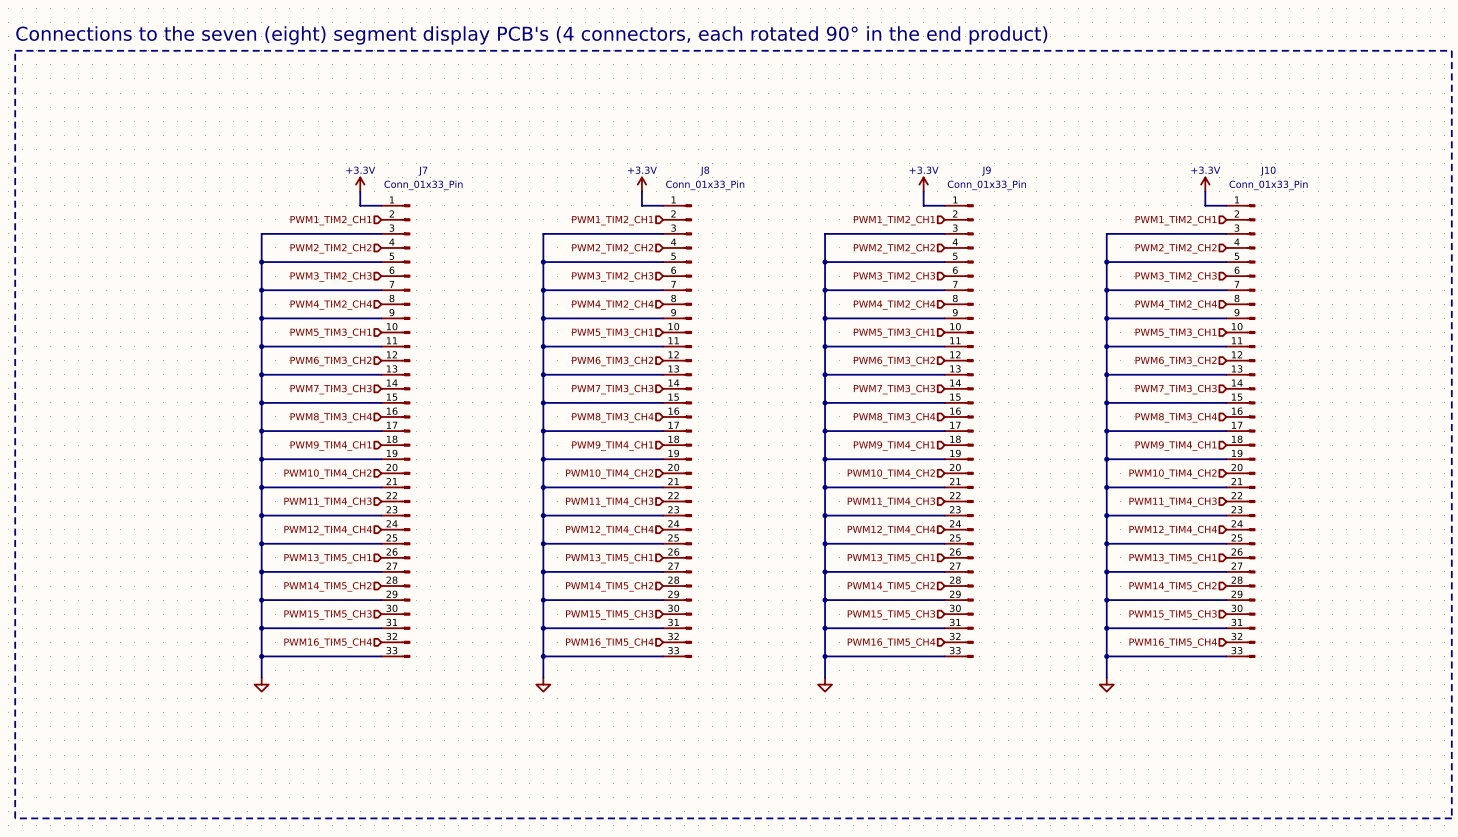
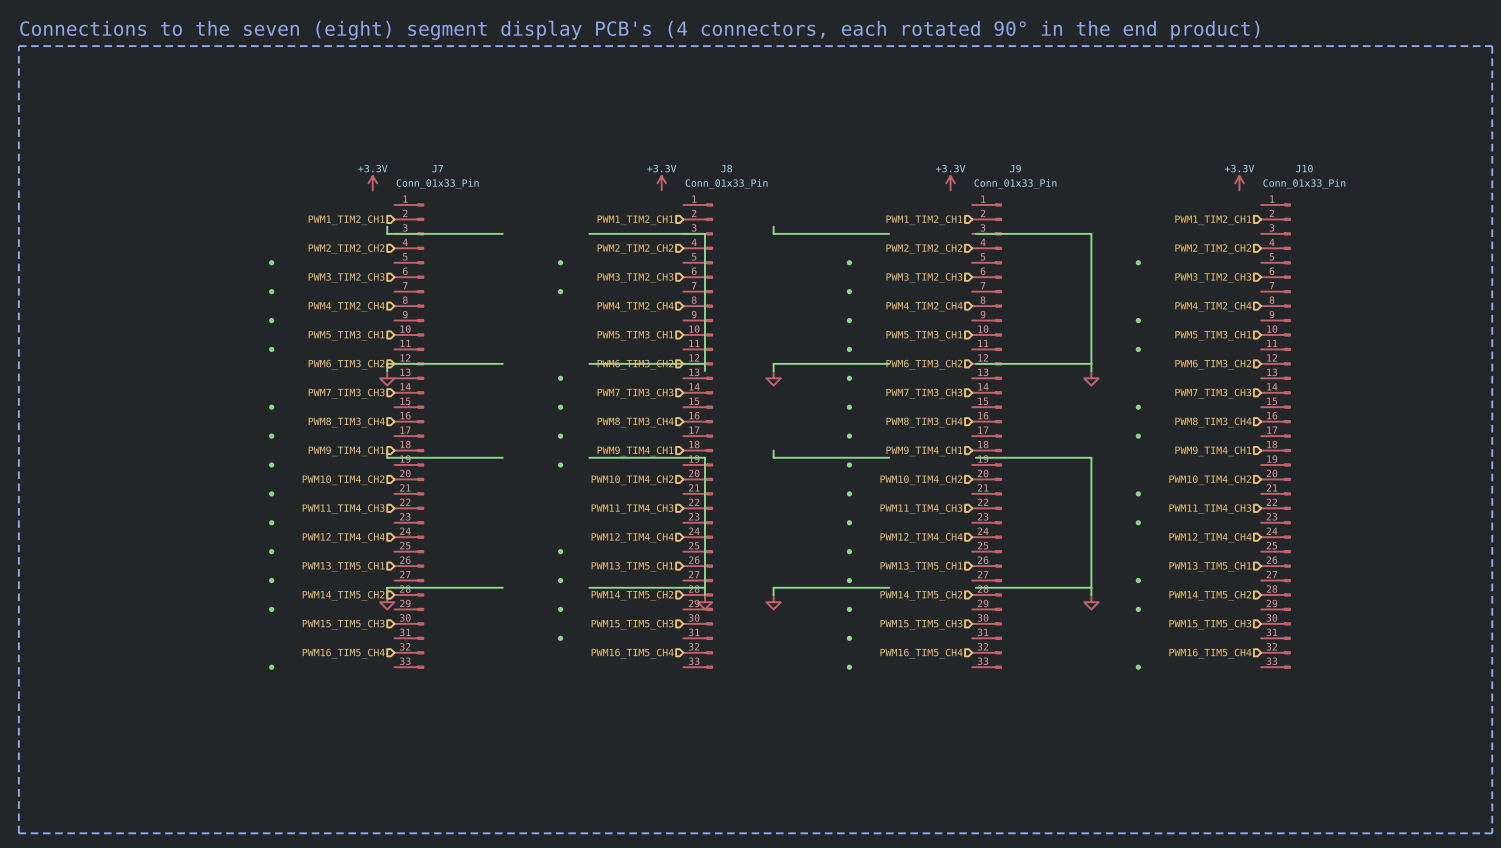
wire: (360, 191) (360, 205) (381, 205) -> none
wire: (641, 191) (641, 205) (663, 205) -> none
wire: (923, 191) (923, 205) (944, 205) -> none
wire: (1205, 191) (1205, 205) (1226, 205) -> none
wire: (374, 233) (261, 233) (261, 677) -> (387, 233) (387, 226)
wire: none -> (394, 233) (502, 233)
wire: (571, 233) (543, 233) (543, 677) -> none
wire: none -> (683, 233) (705, 233) (705, 371)
wire: (825, 233) (825, 677) -> (849, 233) (773, 233) (773, 226)
wire: (863, 233) (944, 233) -> none
wire: none -> (975, 233) (1091, 233) (1091, 371)
wire: (1226, 233) (1106, 233) (1106, 677) -> none
wire: (261, 262) (381, 262) -> none
wire: (543, 262) (663, 262) -> none
wire: (825, 262) (944, 262) -> none
wire: (1106, 262) (1226, 262) -> none
wire: (261, 290) (381, 290) -> none
wire: (543, 290) (663, 290) -> none
wire: (825, 290) (944, 290) -> none
wire: (1106, 290) (1226, 290) -> none
junction: (1106, 290) -> none
wire: (261, 318) (381, 318) -> none
wire: (543, 318) (663, 318) -> none
junction: (543, 318) -> none
wire: (825, 318) (944, 318) -> none
wire: (1106, 318) (1226, 318) -> none
wire: (261, 346) (381, 346) -> none
wire: (543, 346) (663, 346) -> none
junction: (543, 346) -> none
wire: (825, 346) (944, 346) -> none
wire: (1106, 346) (1226, 346) -> none
wire: none -> (502, 363) (387, 363) (387, 371)
wire: none -> (589, 363) (705, 363)
wire: none -> (889, 363) (773, 363) (773, 371)
wire: none -> (975, 363) (1091, 363)
wire: (261, 374) (381, 374) -> none
junction: (261, 374) -> none
power symbol: none -> (387, 378)
wire: (543, 374) (663, 374) -> none
power symbol: none -> (773, 378)
wire: (825, 374) (944, 374) -> none
power symbol: none -> (1091, 378)
wire: (1106, 374) (1226, 374) -> none
junction: (1106, 374) -> none
wire: (261, 402) (381, 402) -> none
wire: (543, 402) (663, 402) -> none
wire: (825, 402) (944, 402) -> none
wire: (1106, 402) (1226, 402) -> none
wire: (261, 431) (381, 431) -> none
wire: (543, 431) (663, 431) -> none
wire: (825, 431) (944, 431) -> none
wire: (1106, 431) (1226, 431) -> none
wire: none -> (387, 450) (387, 457) (502, 457)
wire: none -> (773, 450) (773, 457) (889, 457)
wire: none -> (589, 457) (705, 457) (705, 594)
wire: none -> (975, 457) (1091, 457) (1091, 594)
wire: (261, 459) (381, 459) -> none
wire: (543, 459) (663, 459) -> none
wire: (825, 459) (944, 459) -> none
wire: (1106, 459) (1226, 459) -> none
junction: (1106, 459) -> none
wire: (261, 487) (381, 487) -> none
wire: (543, 487) (663, 487) -> none
junction: (543, 487) -> none
wire: (825, 487) (944, 487) -> none
wire: (1106, 487) (1226, 487) -> none
wire: (261, 515) (381, 515) -> none
wire: (543, 515) (663, 515) -> none
junction: (543, 515) -> none
wire: (825, 515) (944, 515) -> none
wire: (1106, 515) (1226, 515) -> none
wire: (261, 543) (381, 543) -> none
wire: (543, 543) (663, 543) -> none
wire: (825, 543) (944, 543) -> none
wire: (1106, 543) (1226, 543) -> none
junction: (1106, 543) -> none
wire: (261, 571) (381, 571) -> none
wire: (543, 571) (663, 571) -> none
wire: (825, 571) (944, 571) -> none
wire: (1106, 571) (1226, 571) -> none
wire: none -> (502, 587) (387, 587) (387, 594)
wire: none -> (589, 587) (705, 587)
wire: none -> (889, 587) (773, 587) (773, 594)
wire: none -> (975, 587) (1091, 587)
power symbol: none -> (387, 602)
power symbol: none -> (705, 602)
power symbol: none -> (773, 602)
wire: (261, 600) (381, 600) -> none
wire: (543, 600) (663, 600) -> none
wire: (825, 600) (944, 600) -> none
wire: (1106, 600) (1226, 600) -> none
wire: (261, 628) (381, 628) -> none
junction: (261, 628) -> none
wire: (543, 628) (663, 628) -> none
wire: (825, 628) (944, 628) -> none
wire: (1106, 628) (1226, 628) -> none
junction: (1106, 628) -> none
wire: (261, 656) (381, 656) -> none
wire: (543, 656) (663, 656) -> none
junction: (543, 656) -> none
wire: (825, 656) (944, 656) -> none
wire: (1106, 656) (1226, 656) -> none
power symbol: (261, 684) -> none
power symbol: (543, 684) -> none
power symbol: (825, 684) -> none
power symbol position: (1106, 684) -> (1091, 602)

